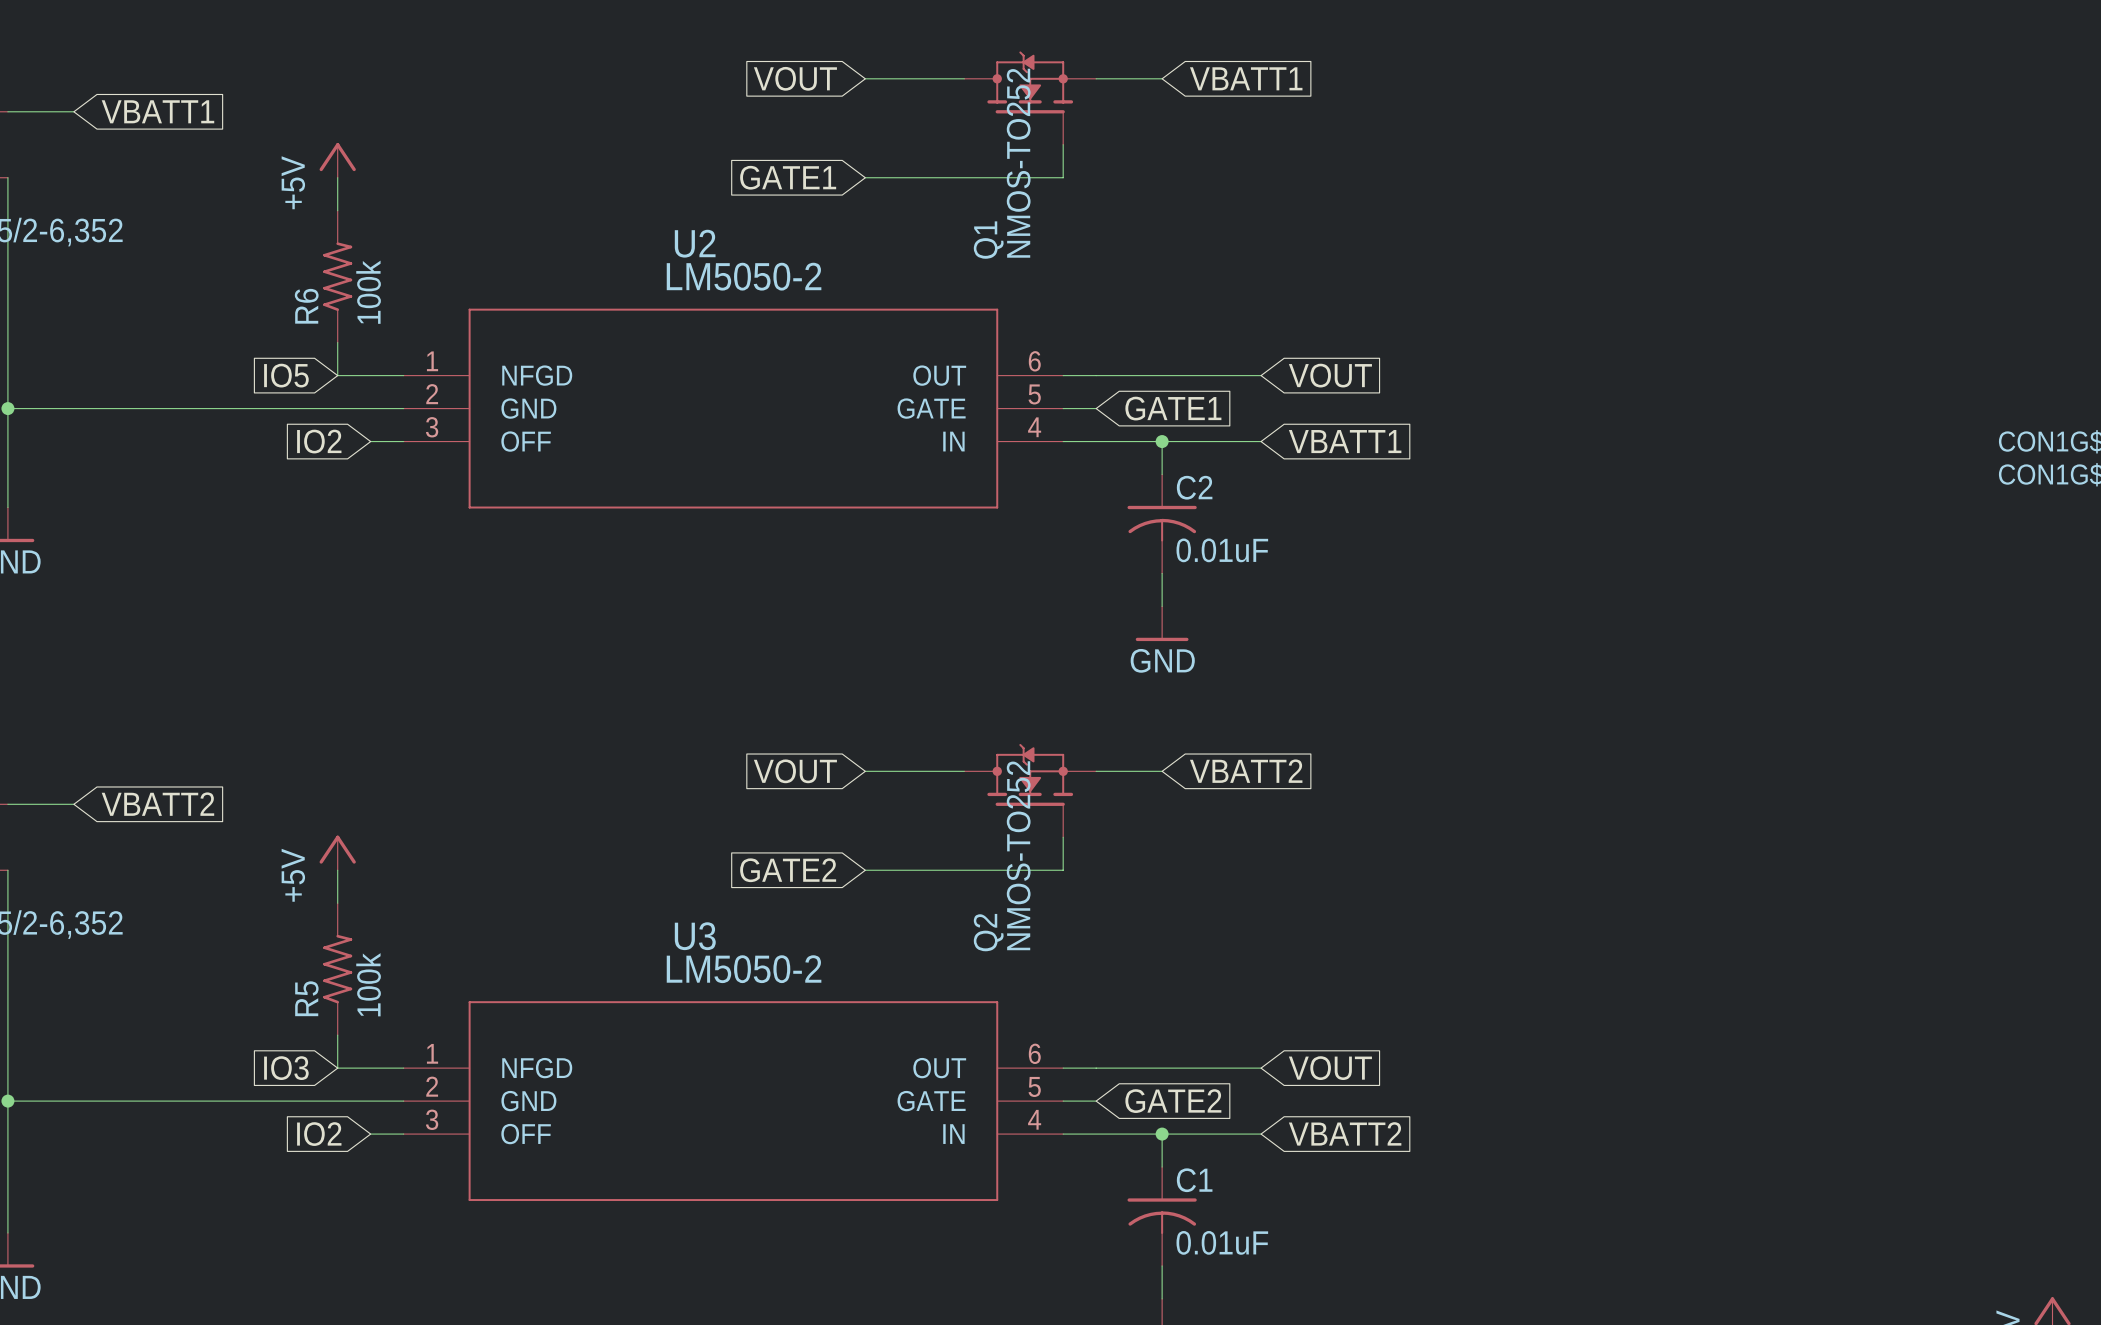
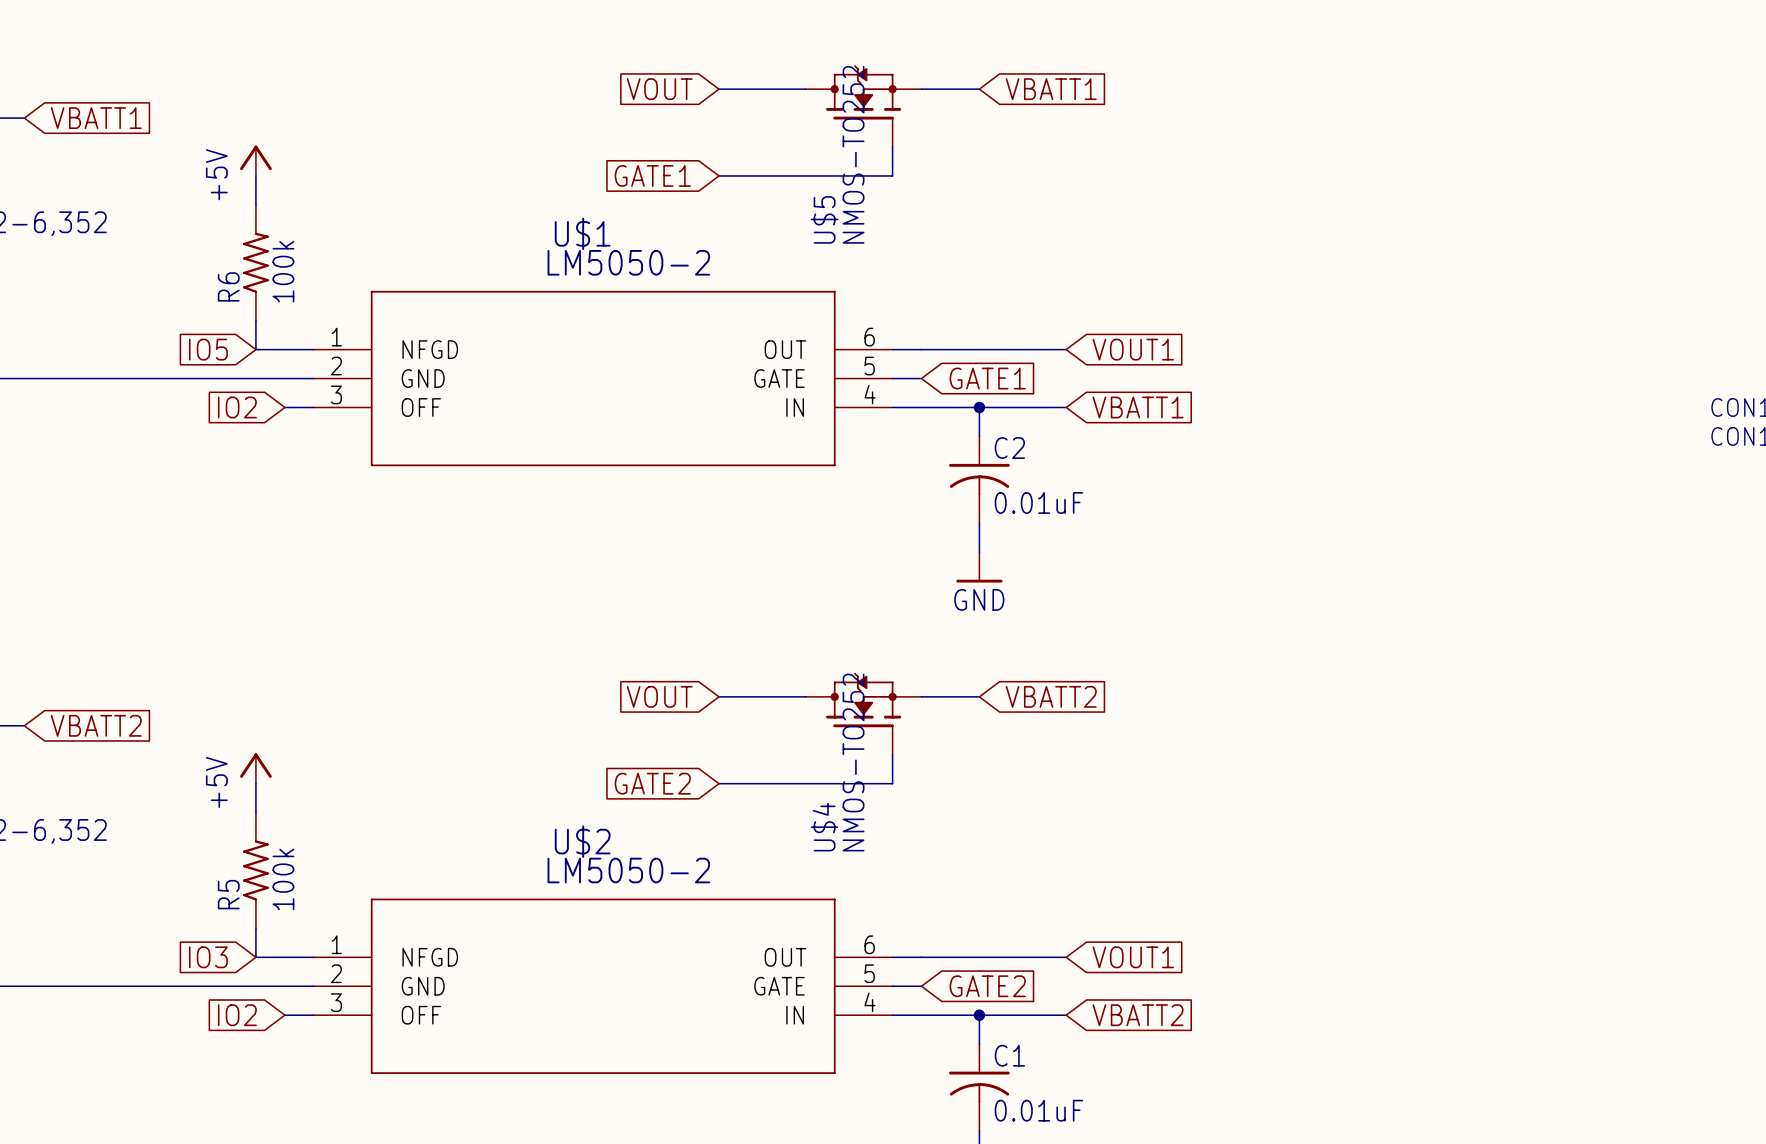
Q1 name: Q1 (988, 240) -> U$5 (824, 219)
U2 name: U2 (695, 243) -> U$1 (582, 233)
global label: VOUT (1330, 375) -> VOUT1 (1133, 349)
Q2 name: Q2 (988, 932) -> U$4 (824, 827)
U3 name: U3 (695, 936) -> U$2 (582, 841)
global label: VOUT (1330, 1068) -> VOUT1 (1133, 957)

